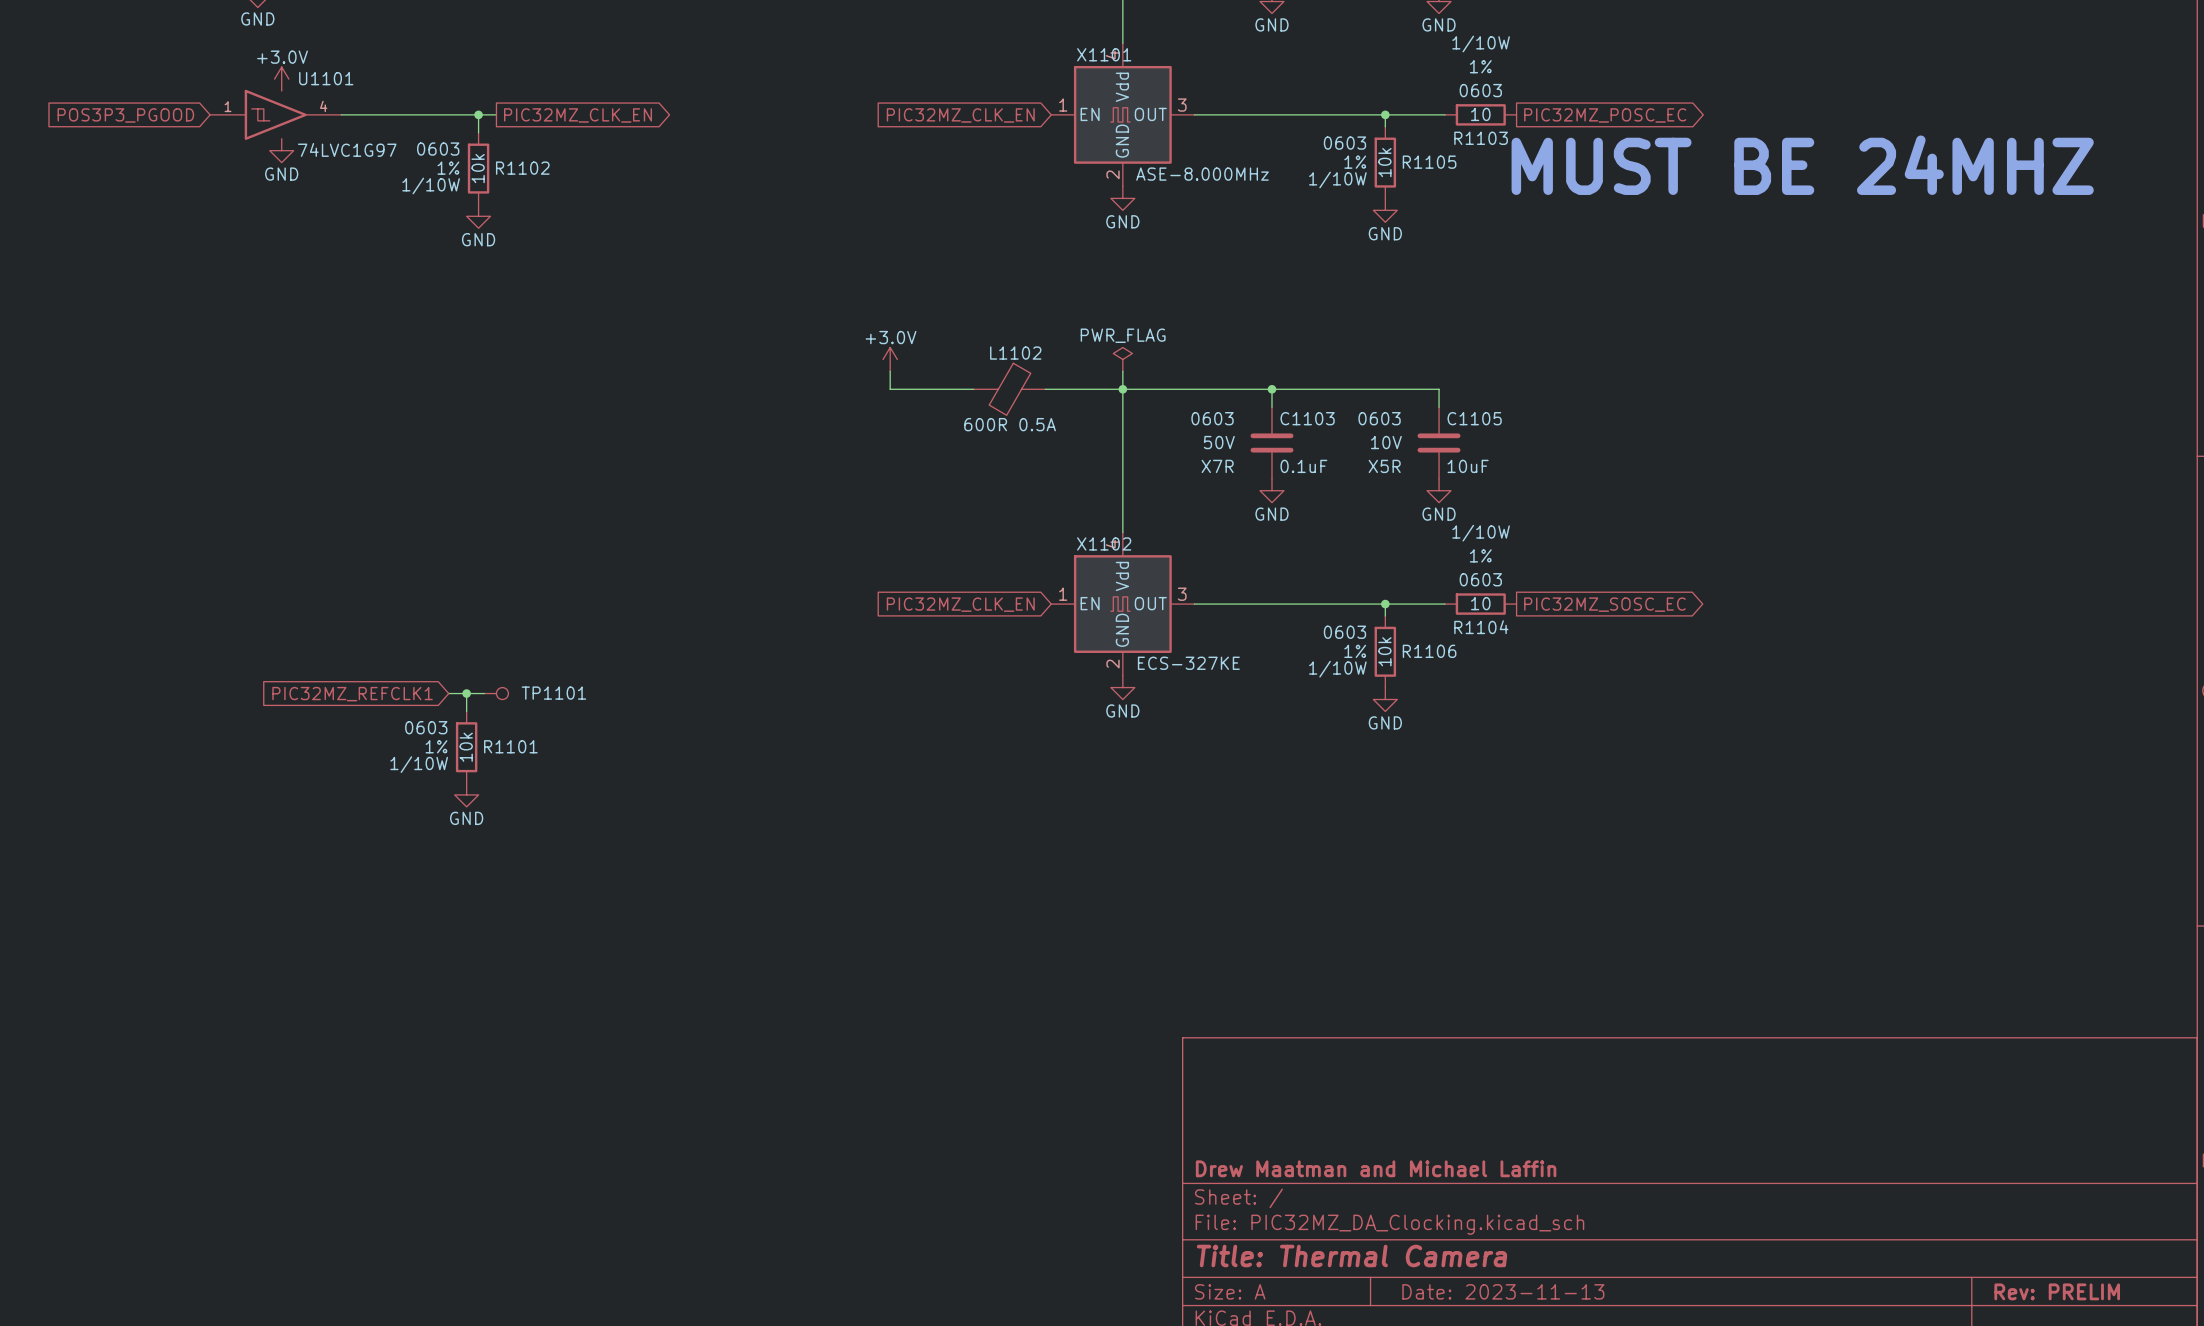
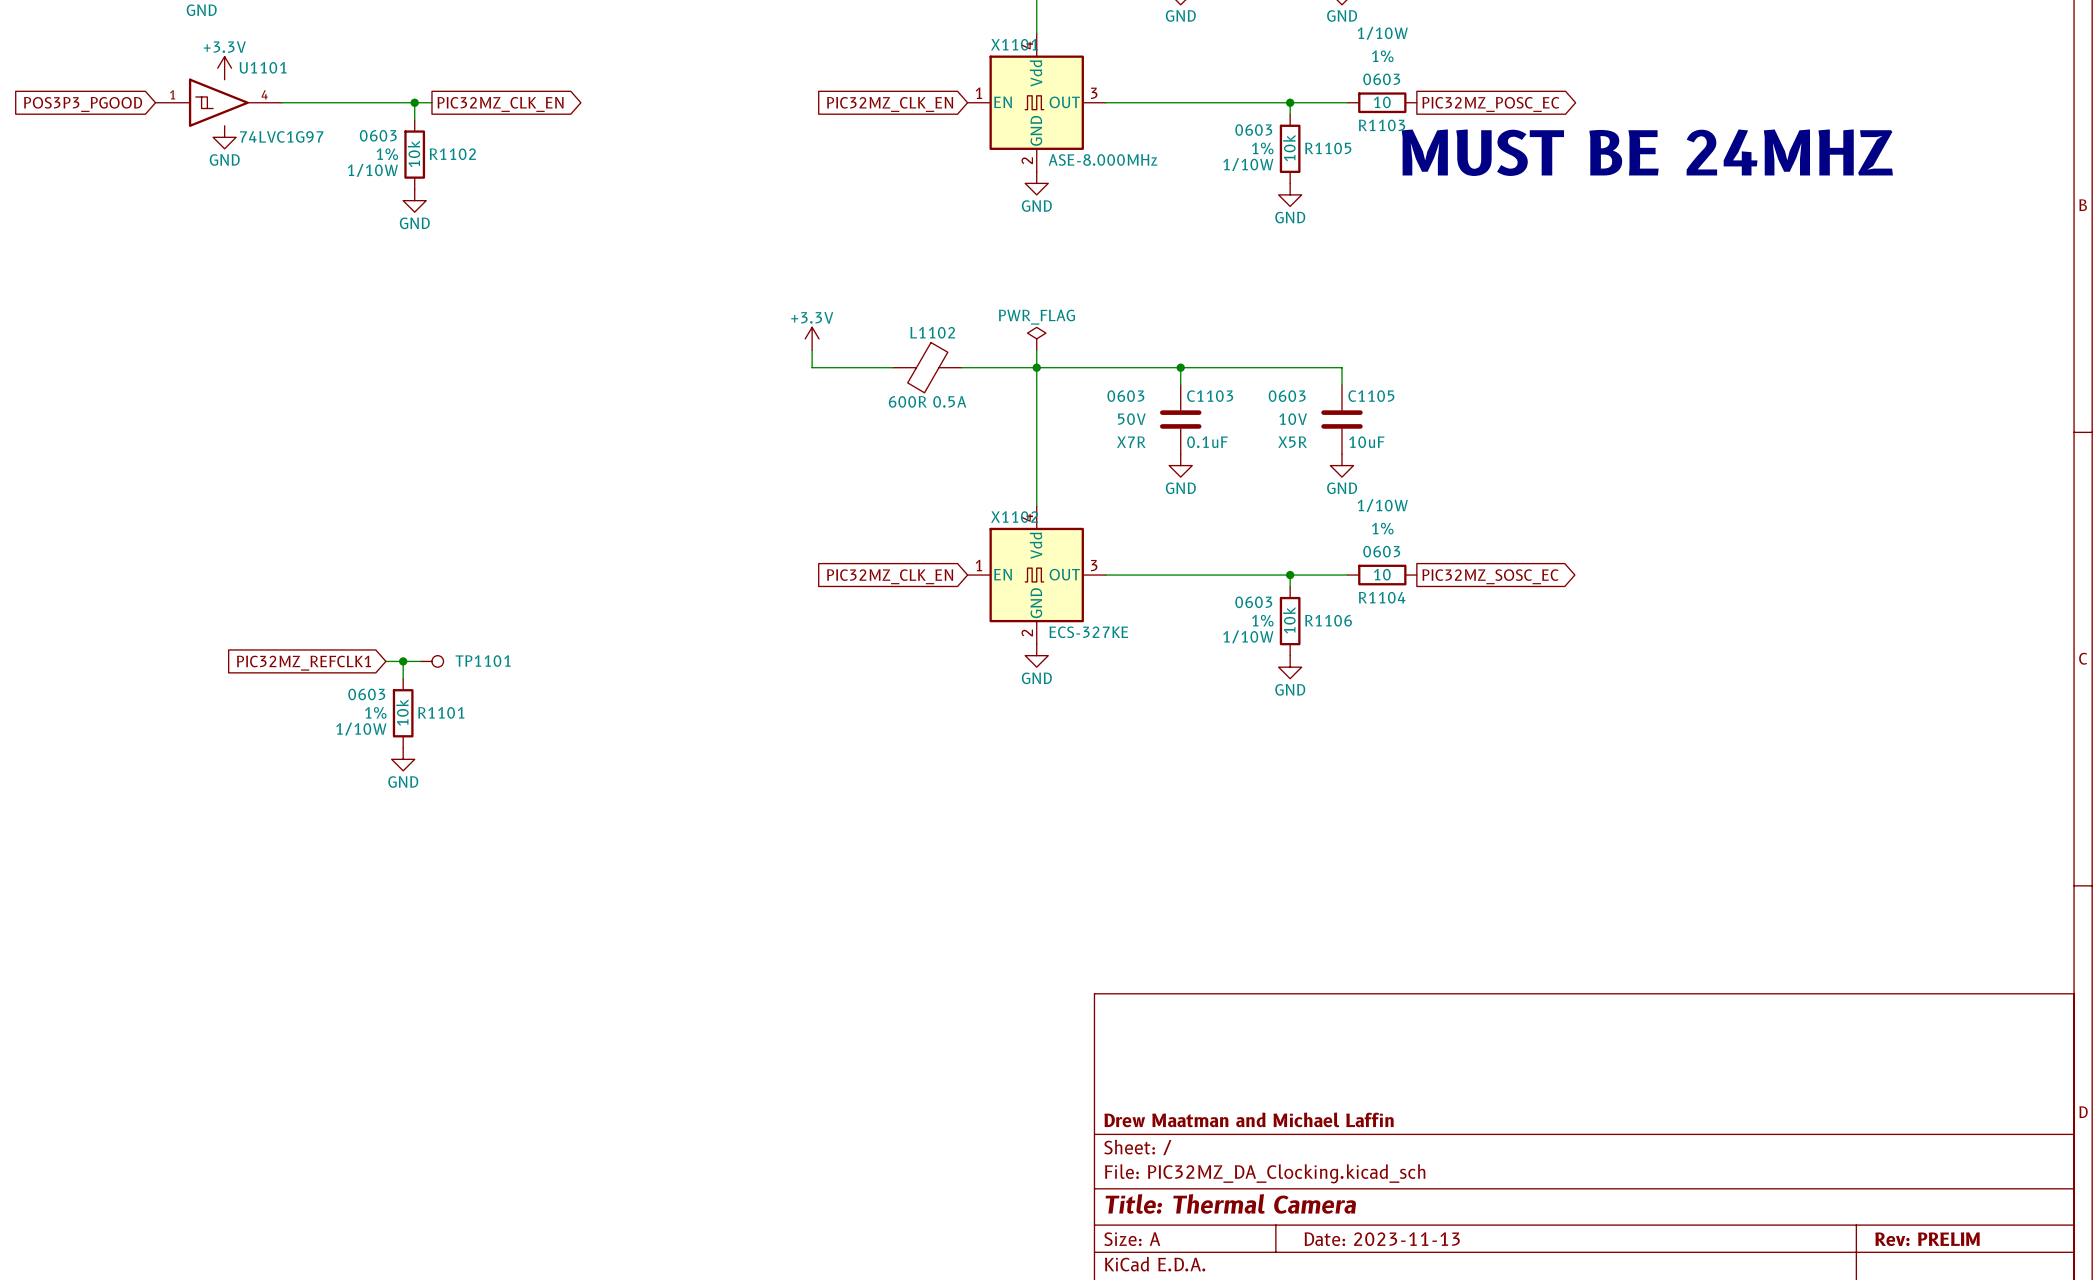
power symbol: +3.0V (281, 79) -> +3.3V (224, 68)
power symbol: +3.0V (890, 359) -> +3.3V (812, 338)

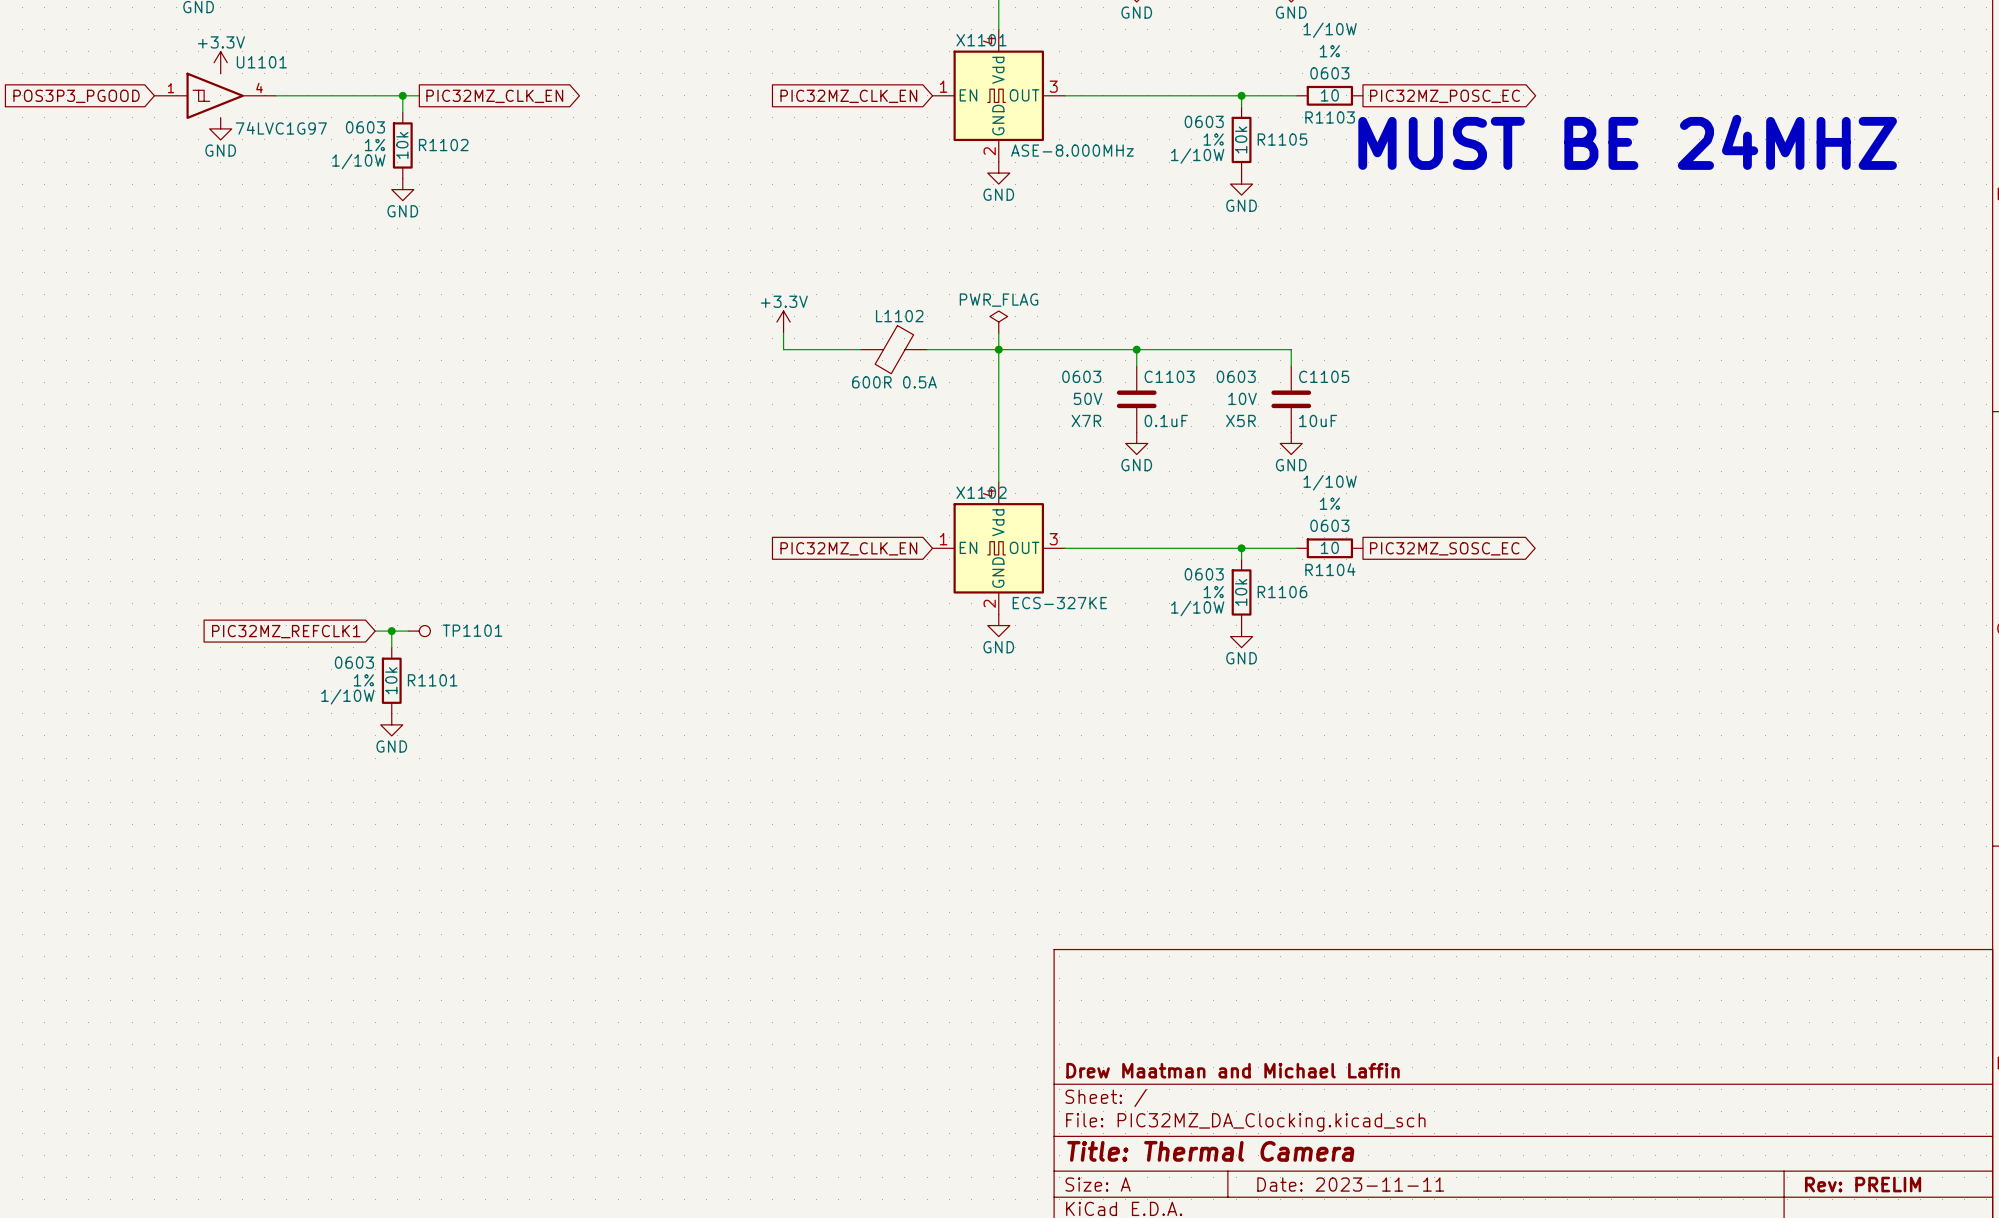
title block: Date: 2023-11-13 (1382, 1239) -> Date: 2023-11-11 (1350, 1184)

